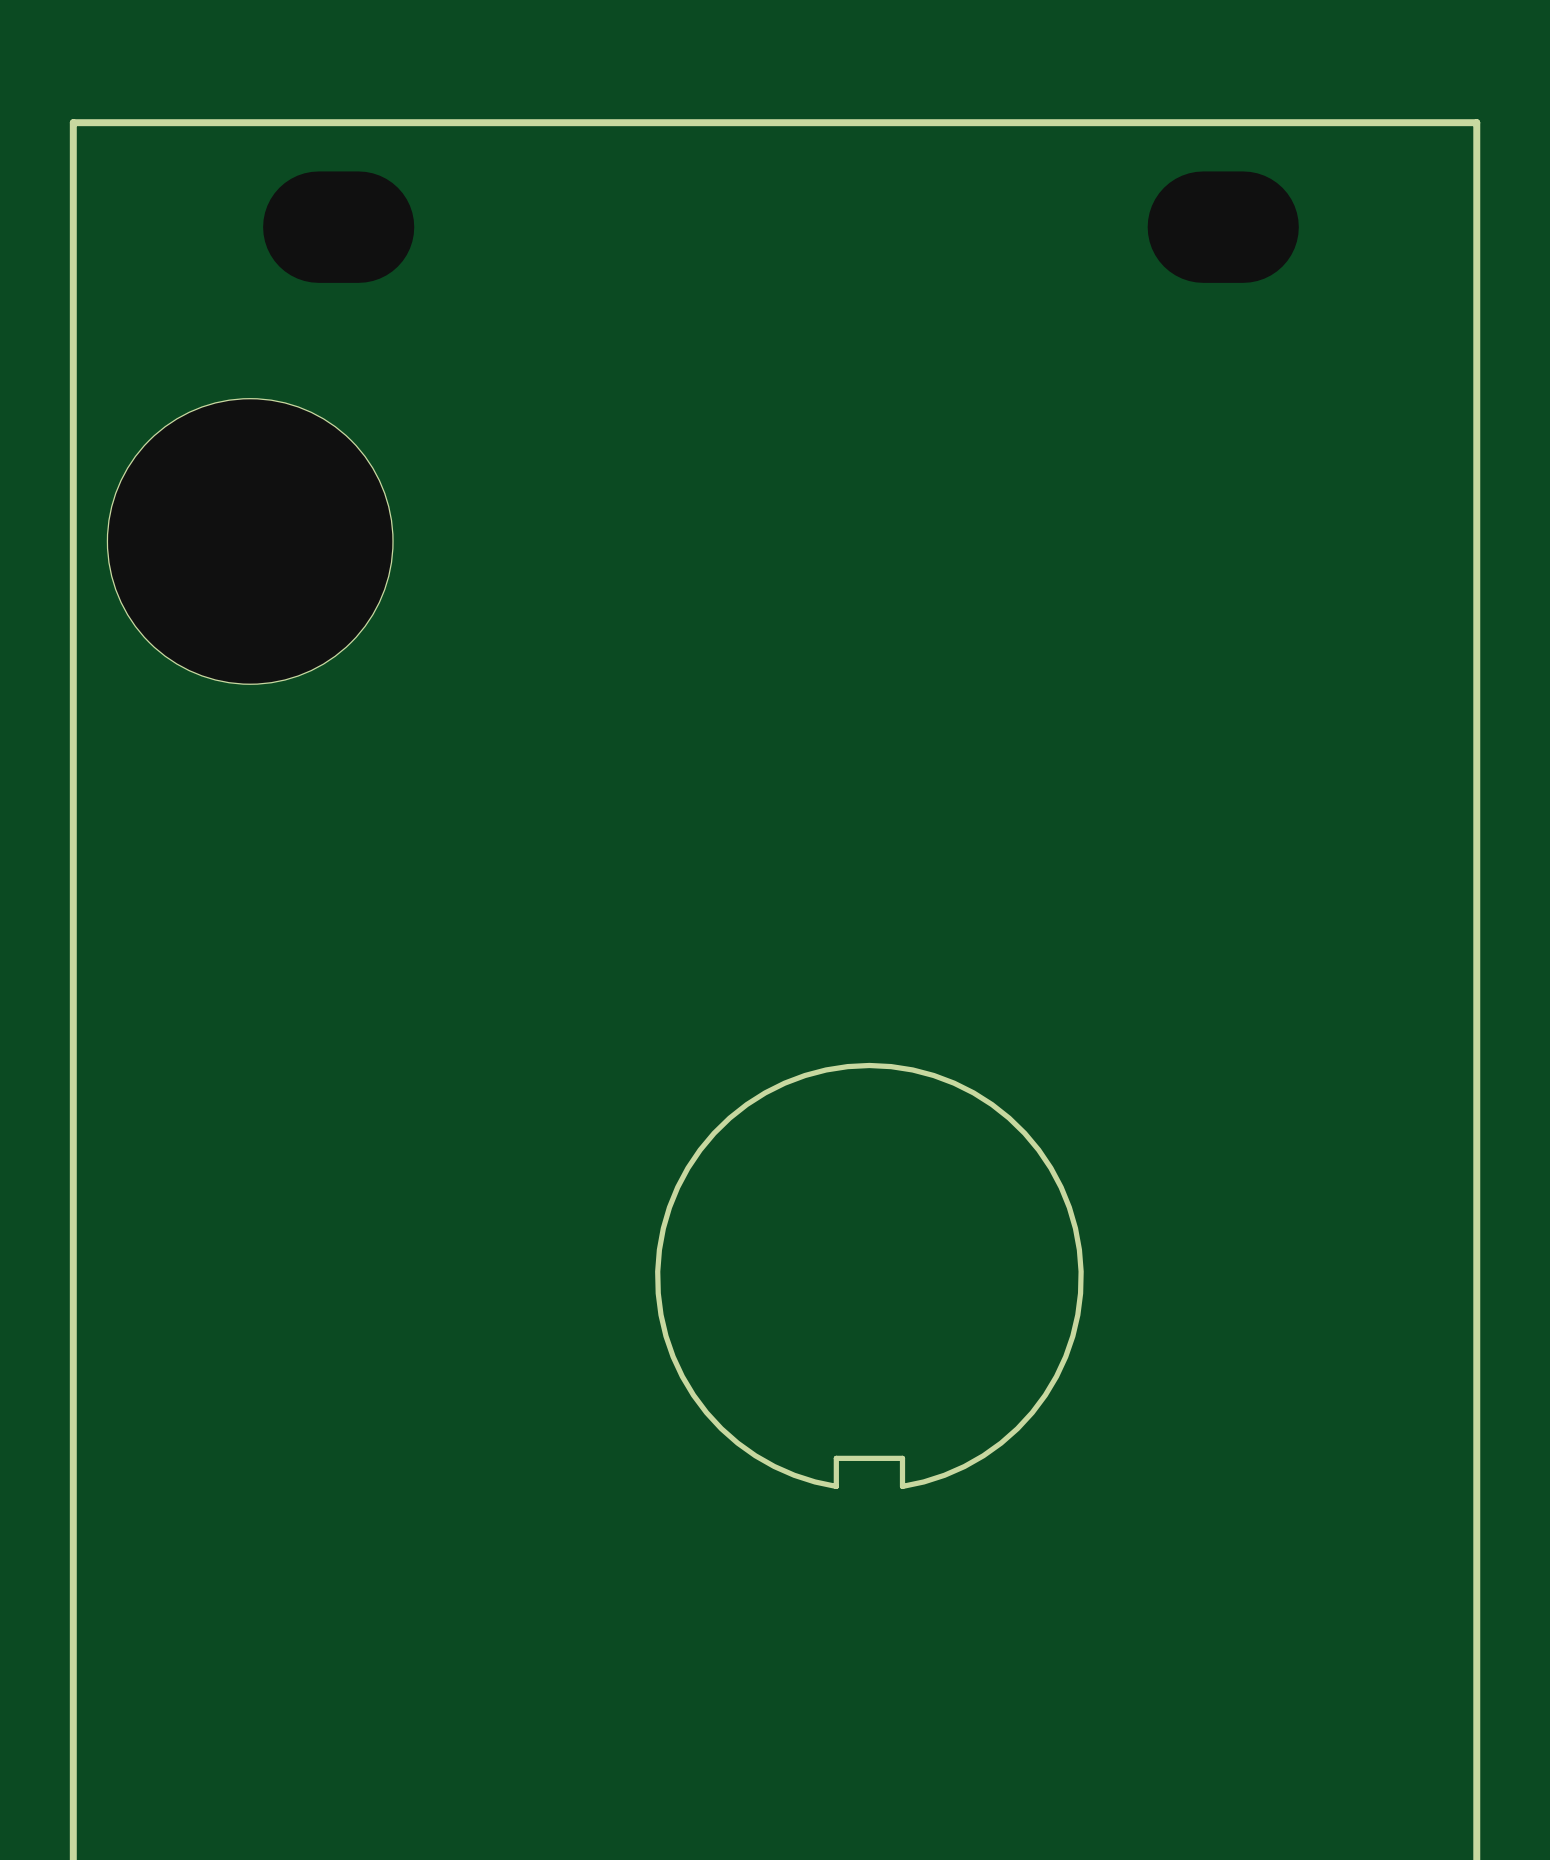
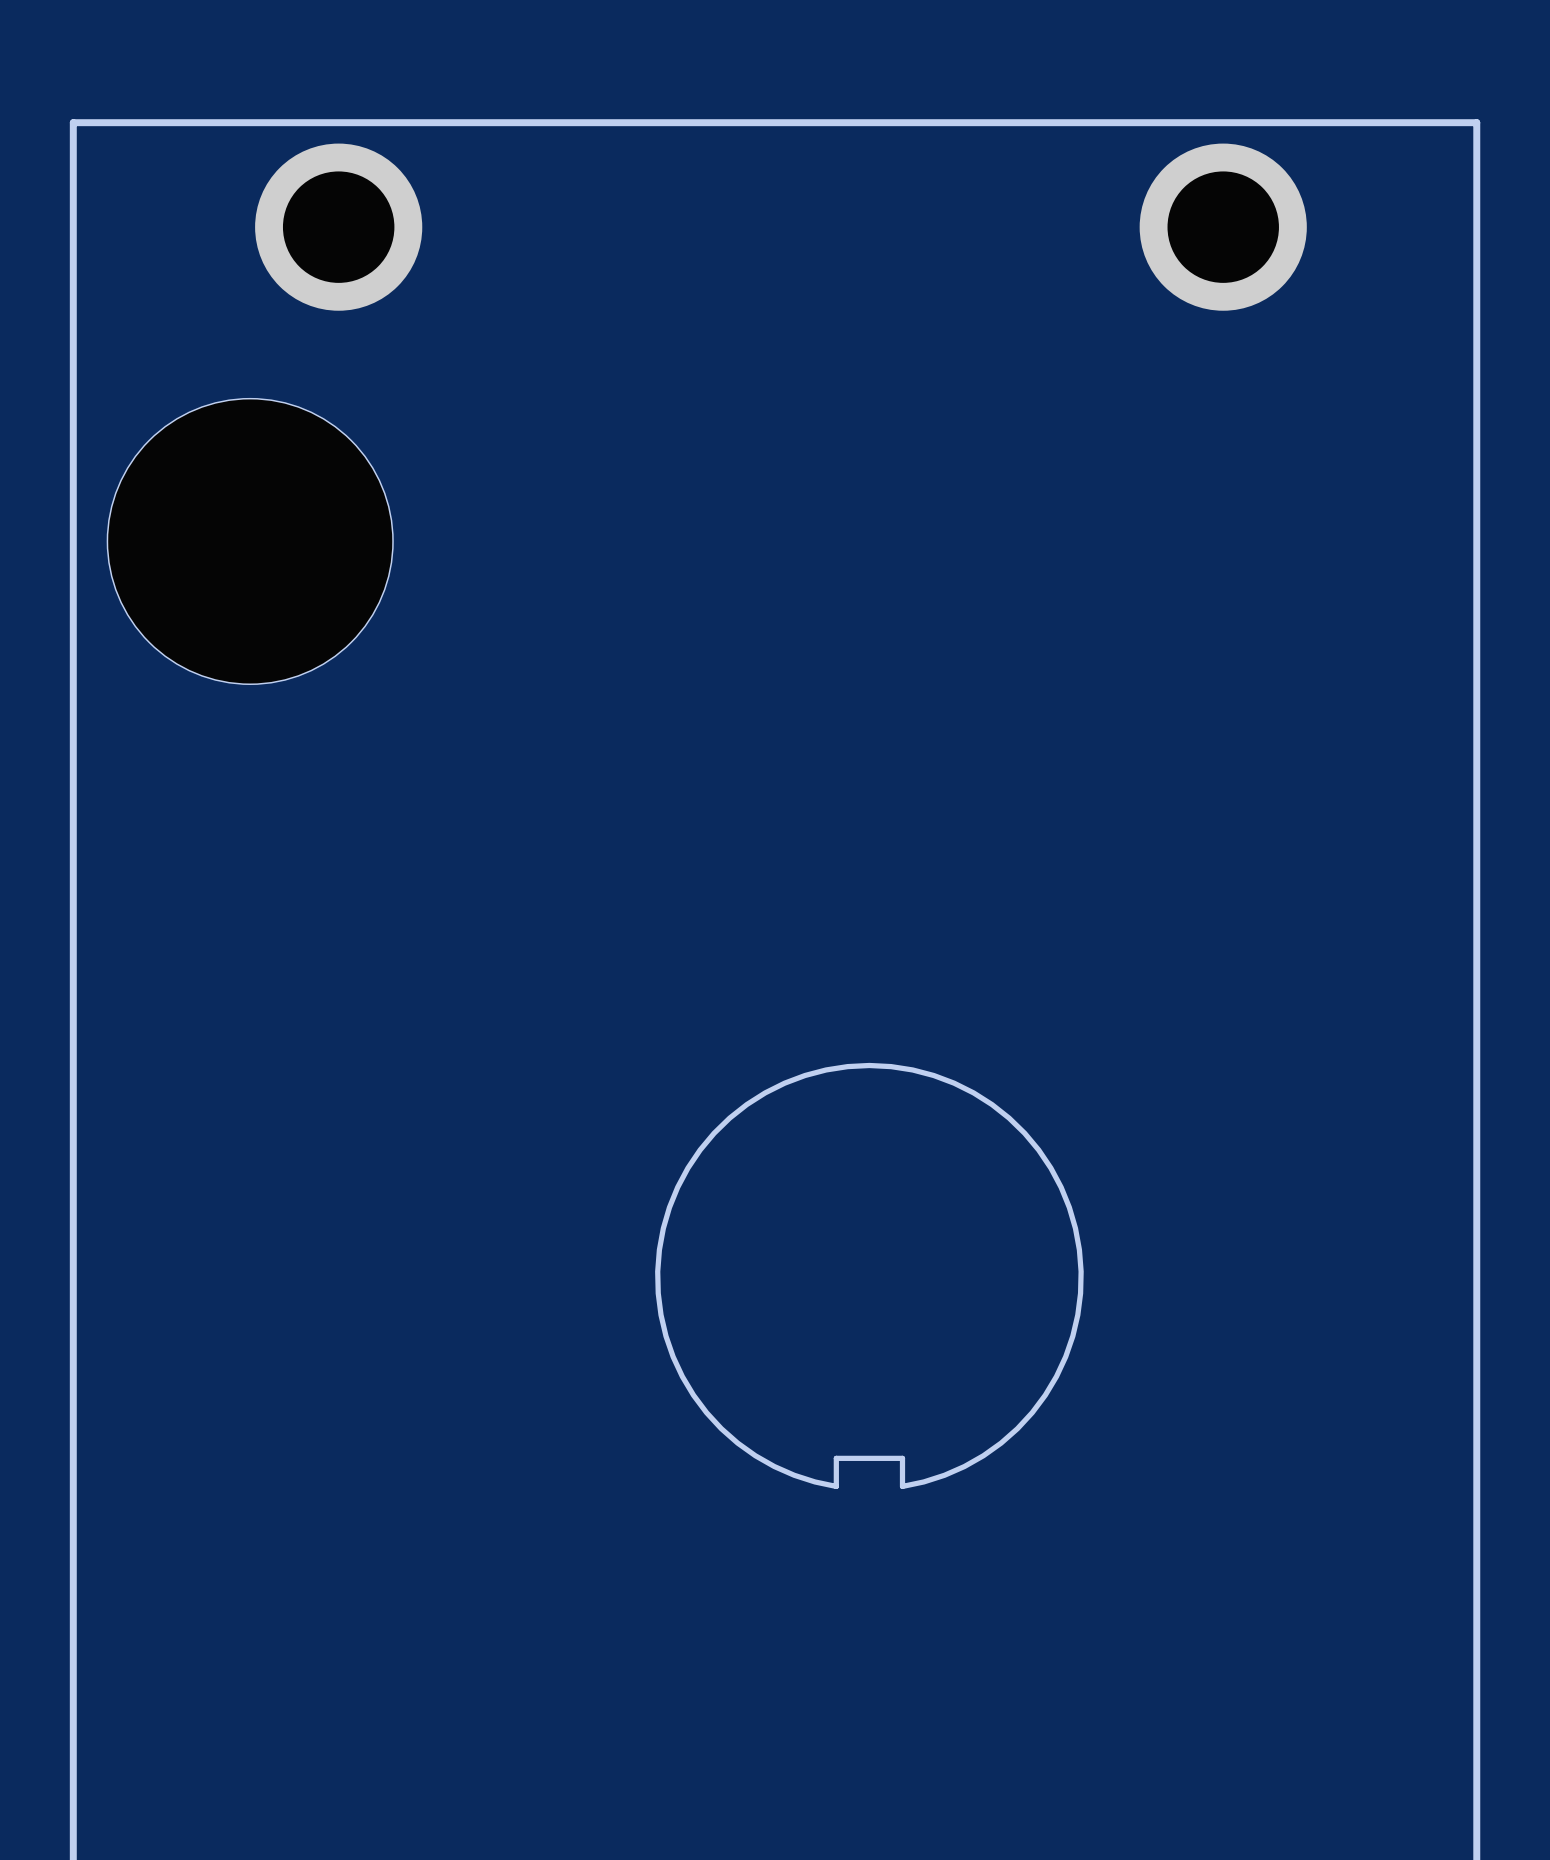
part footprint: [263, 171, 415, 283] -> [255, 143, 423, 311]
part footprint: [1147, 171, 1299, 283] -> [1139, 143, 1307, 311]

